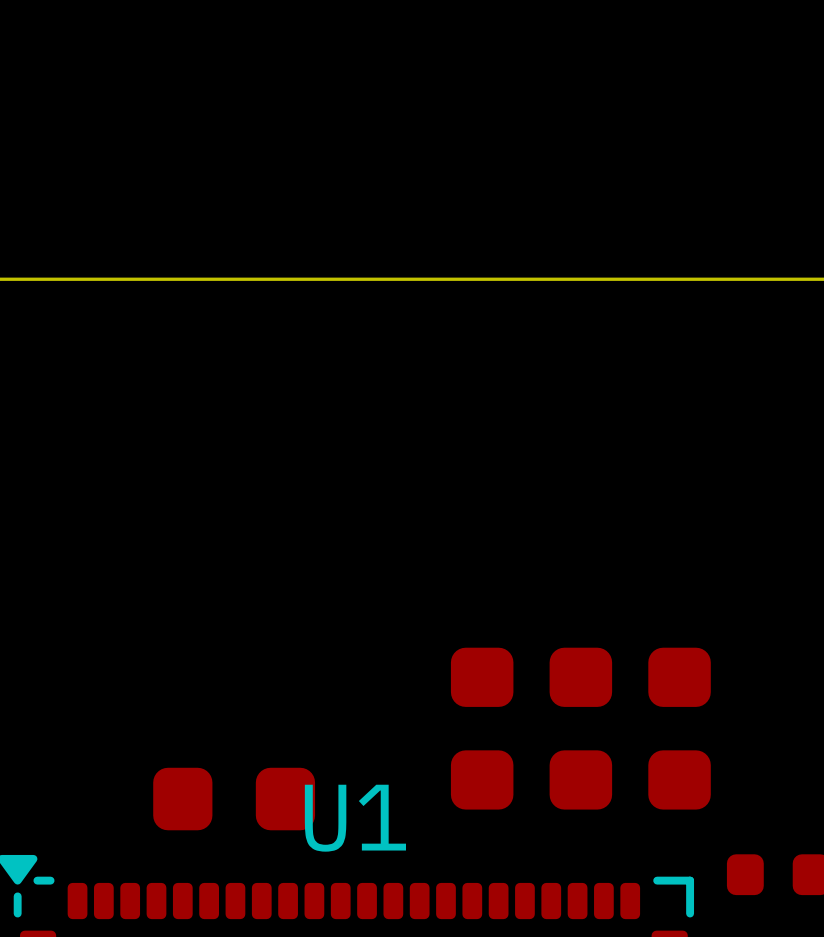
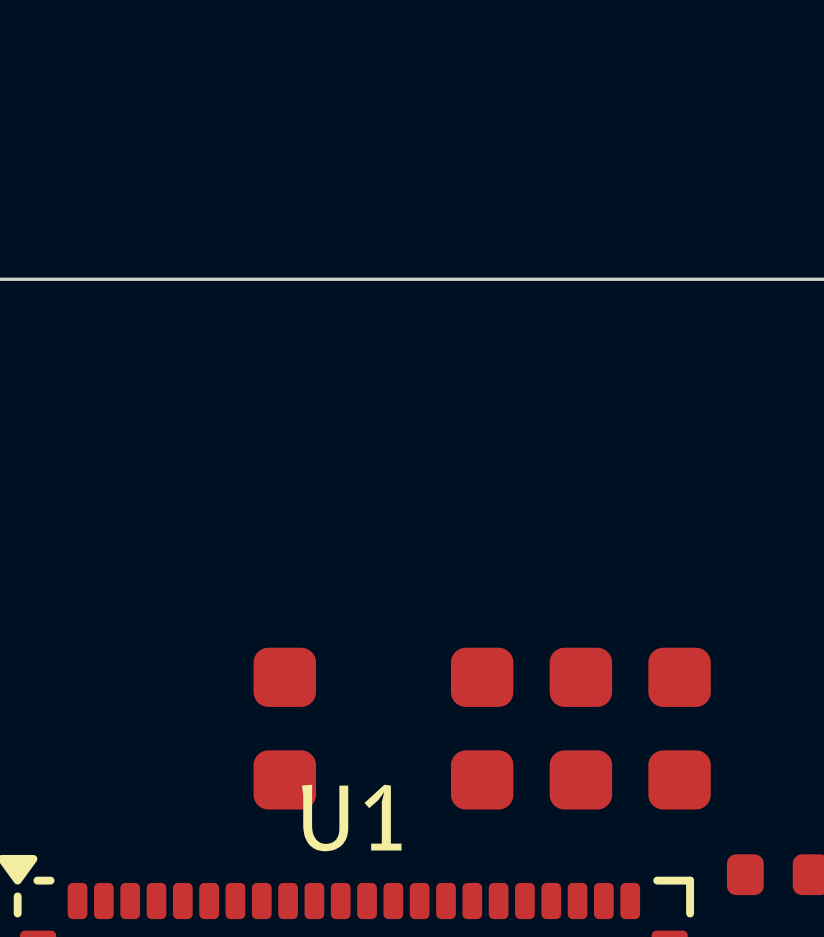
part rotation: 0° (234, 799) -> 90° clockwise (284, 728)

